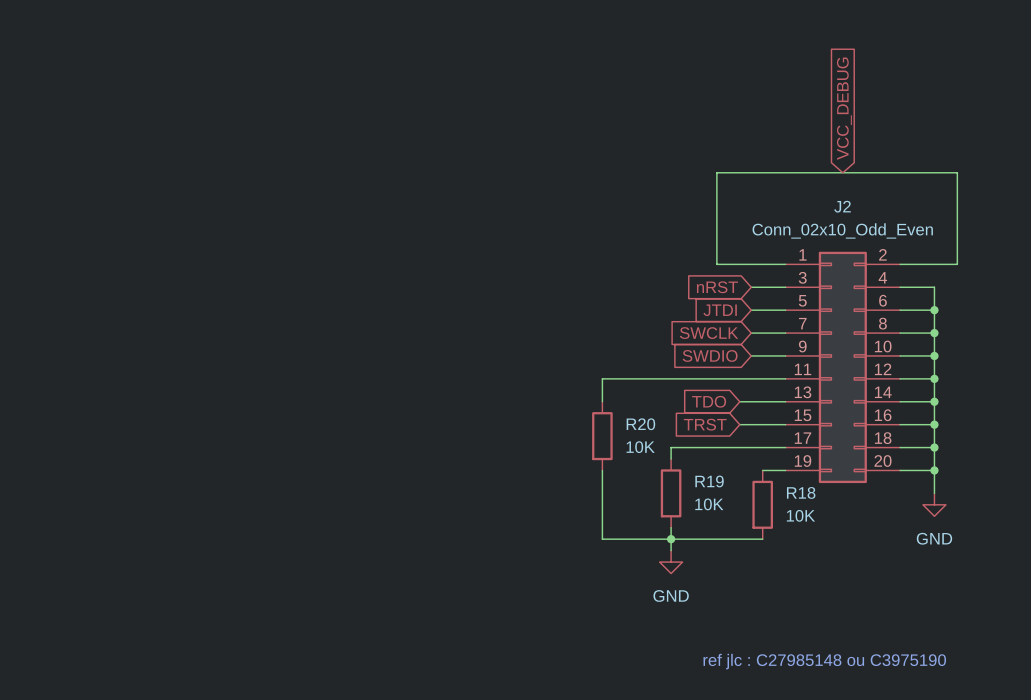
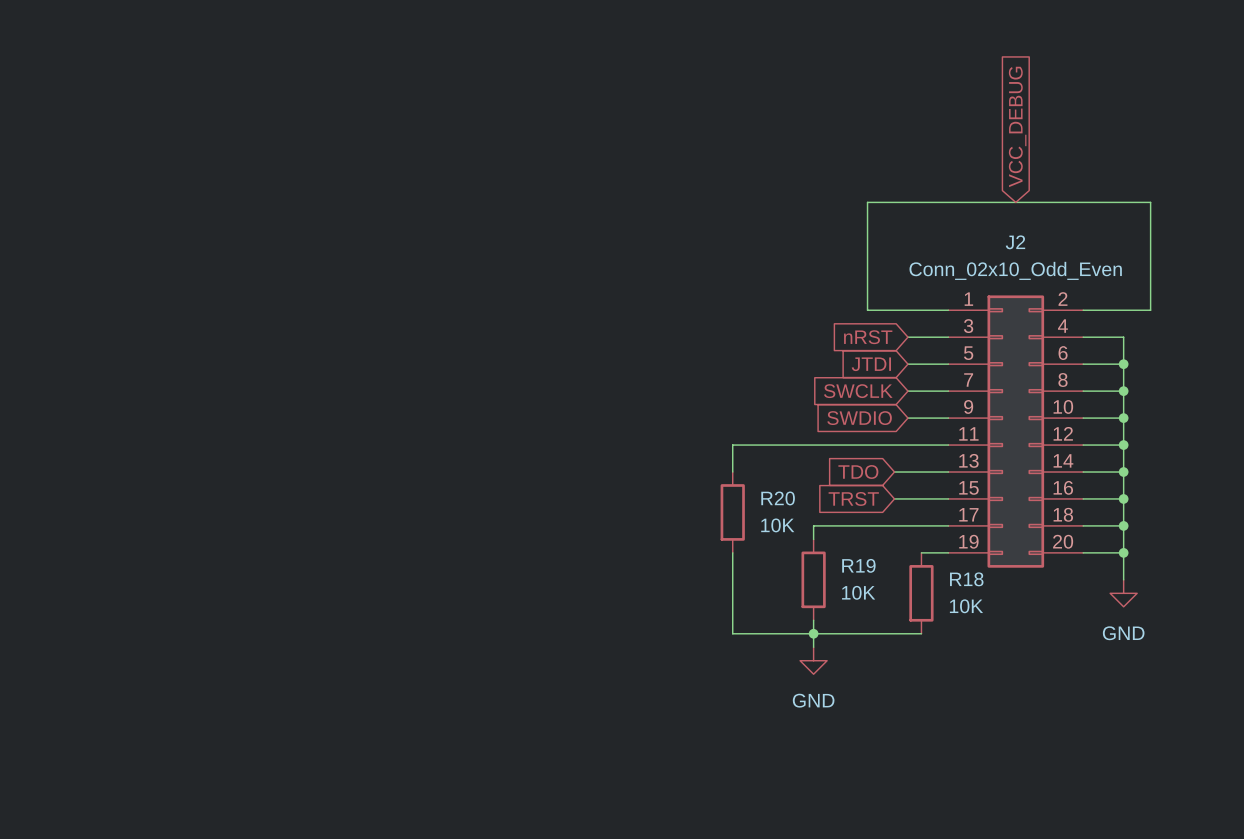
text: ref jlc : C27985148 ou C3975190 (824, 661) -> none

